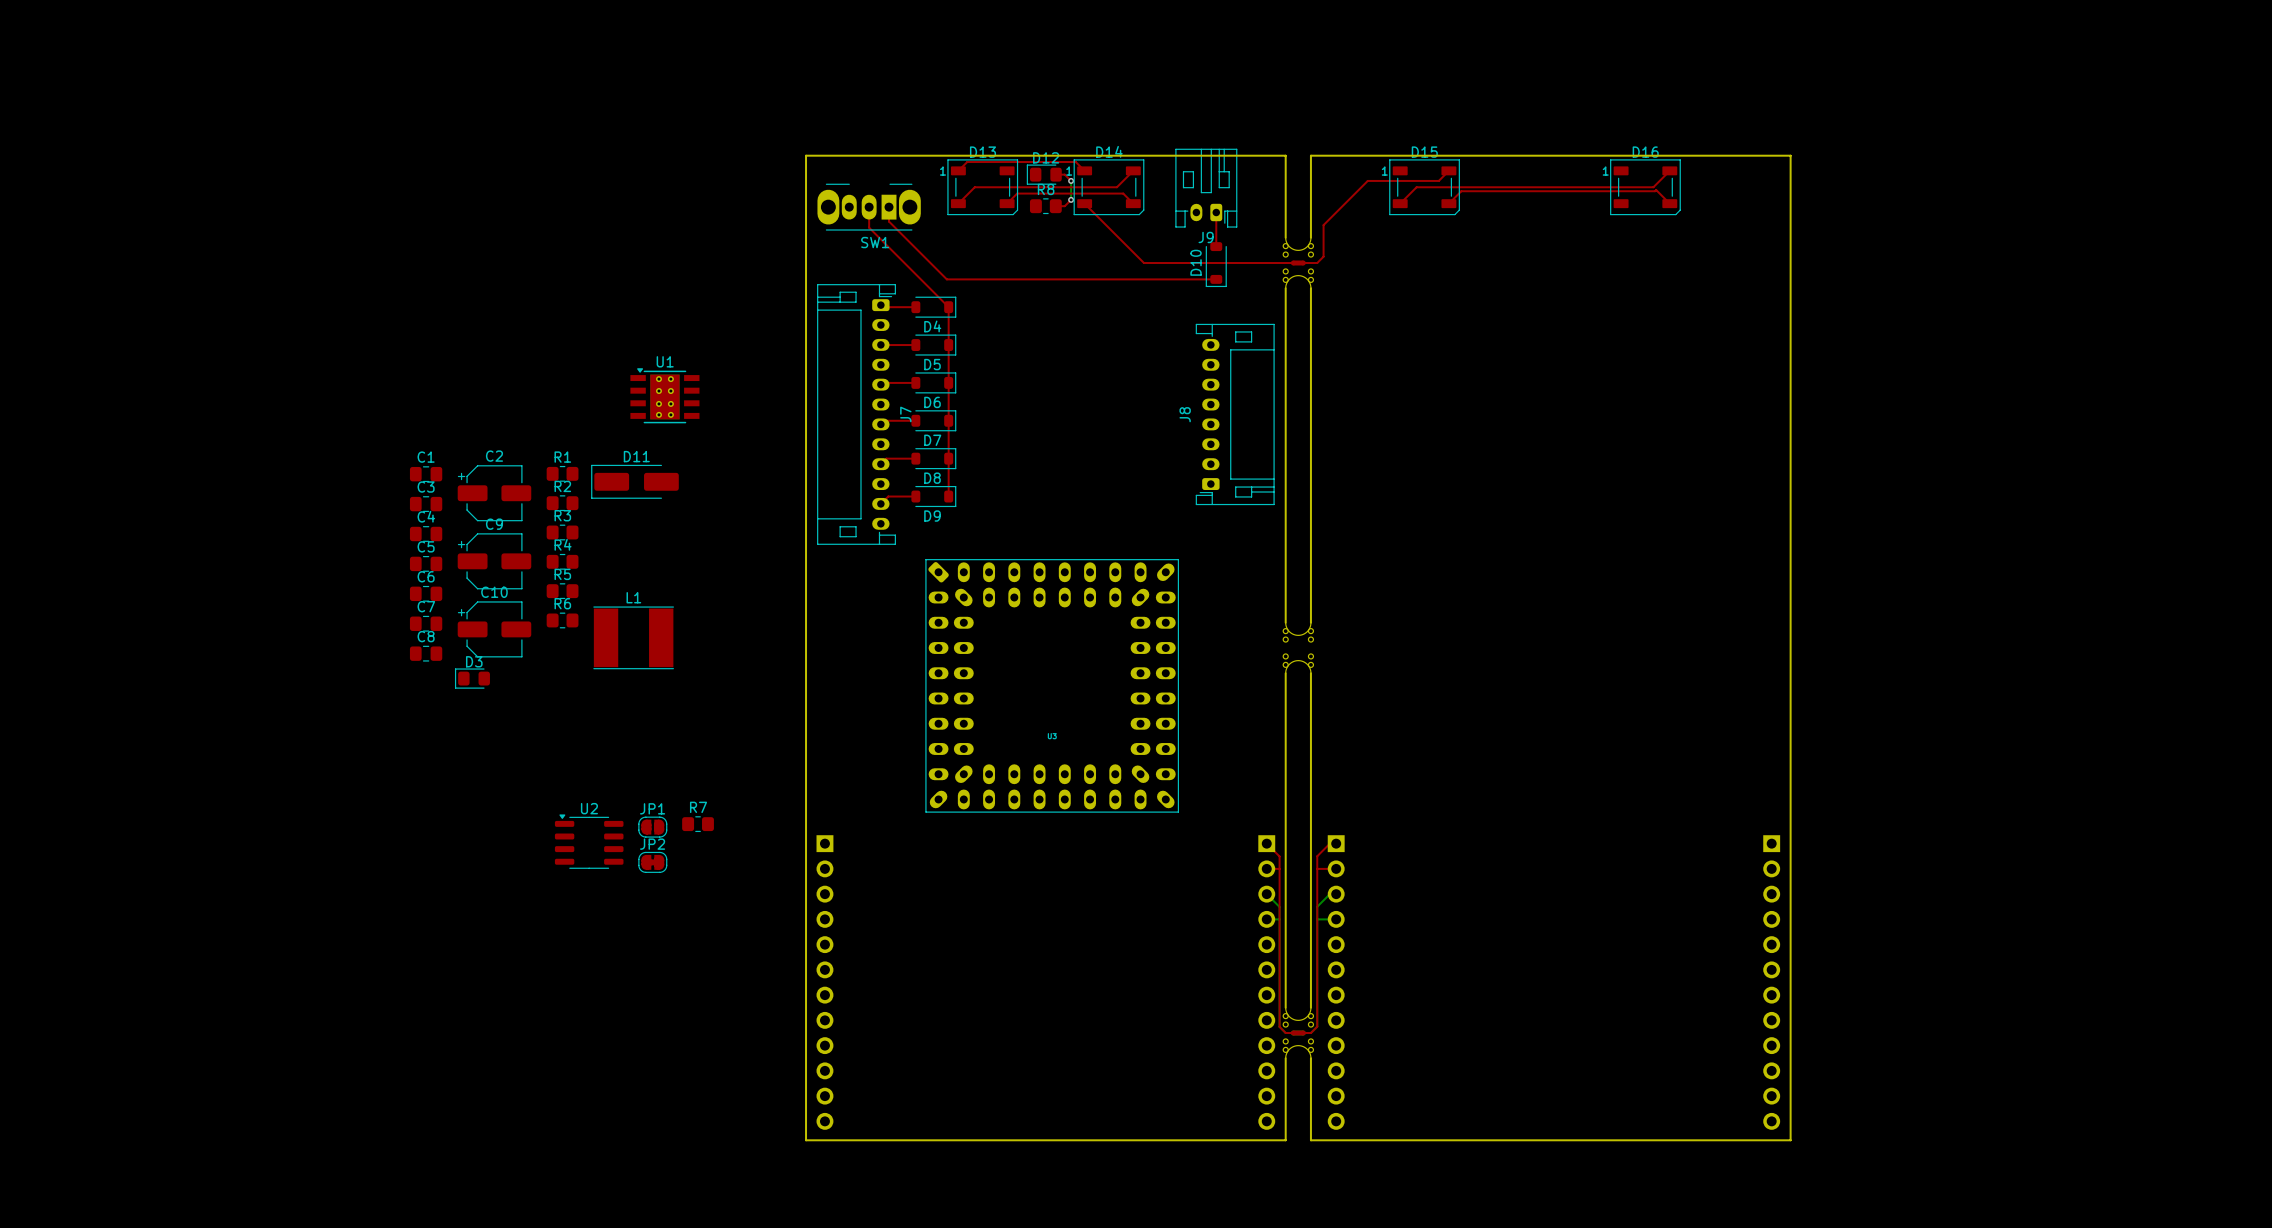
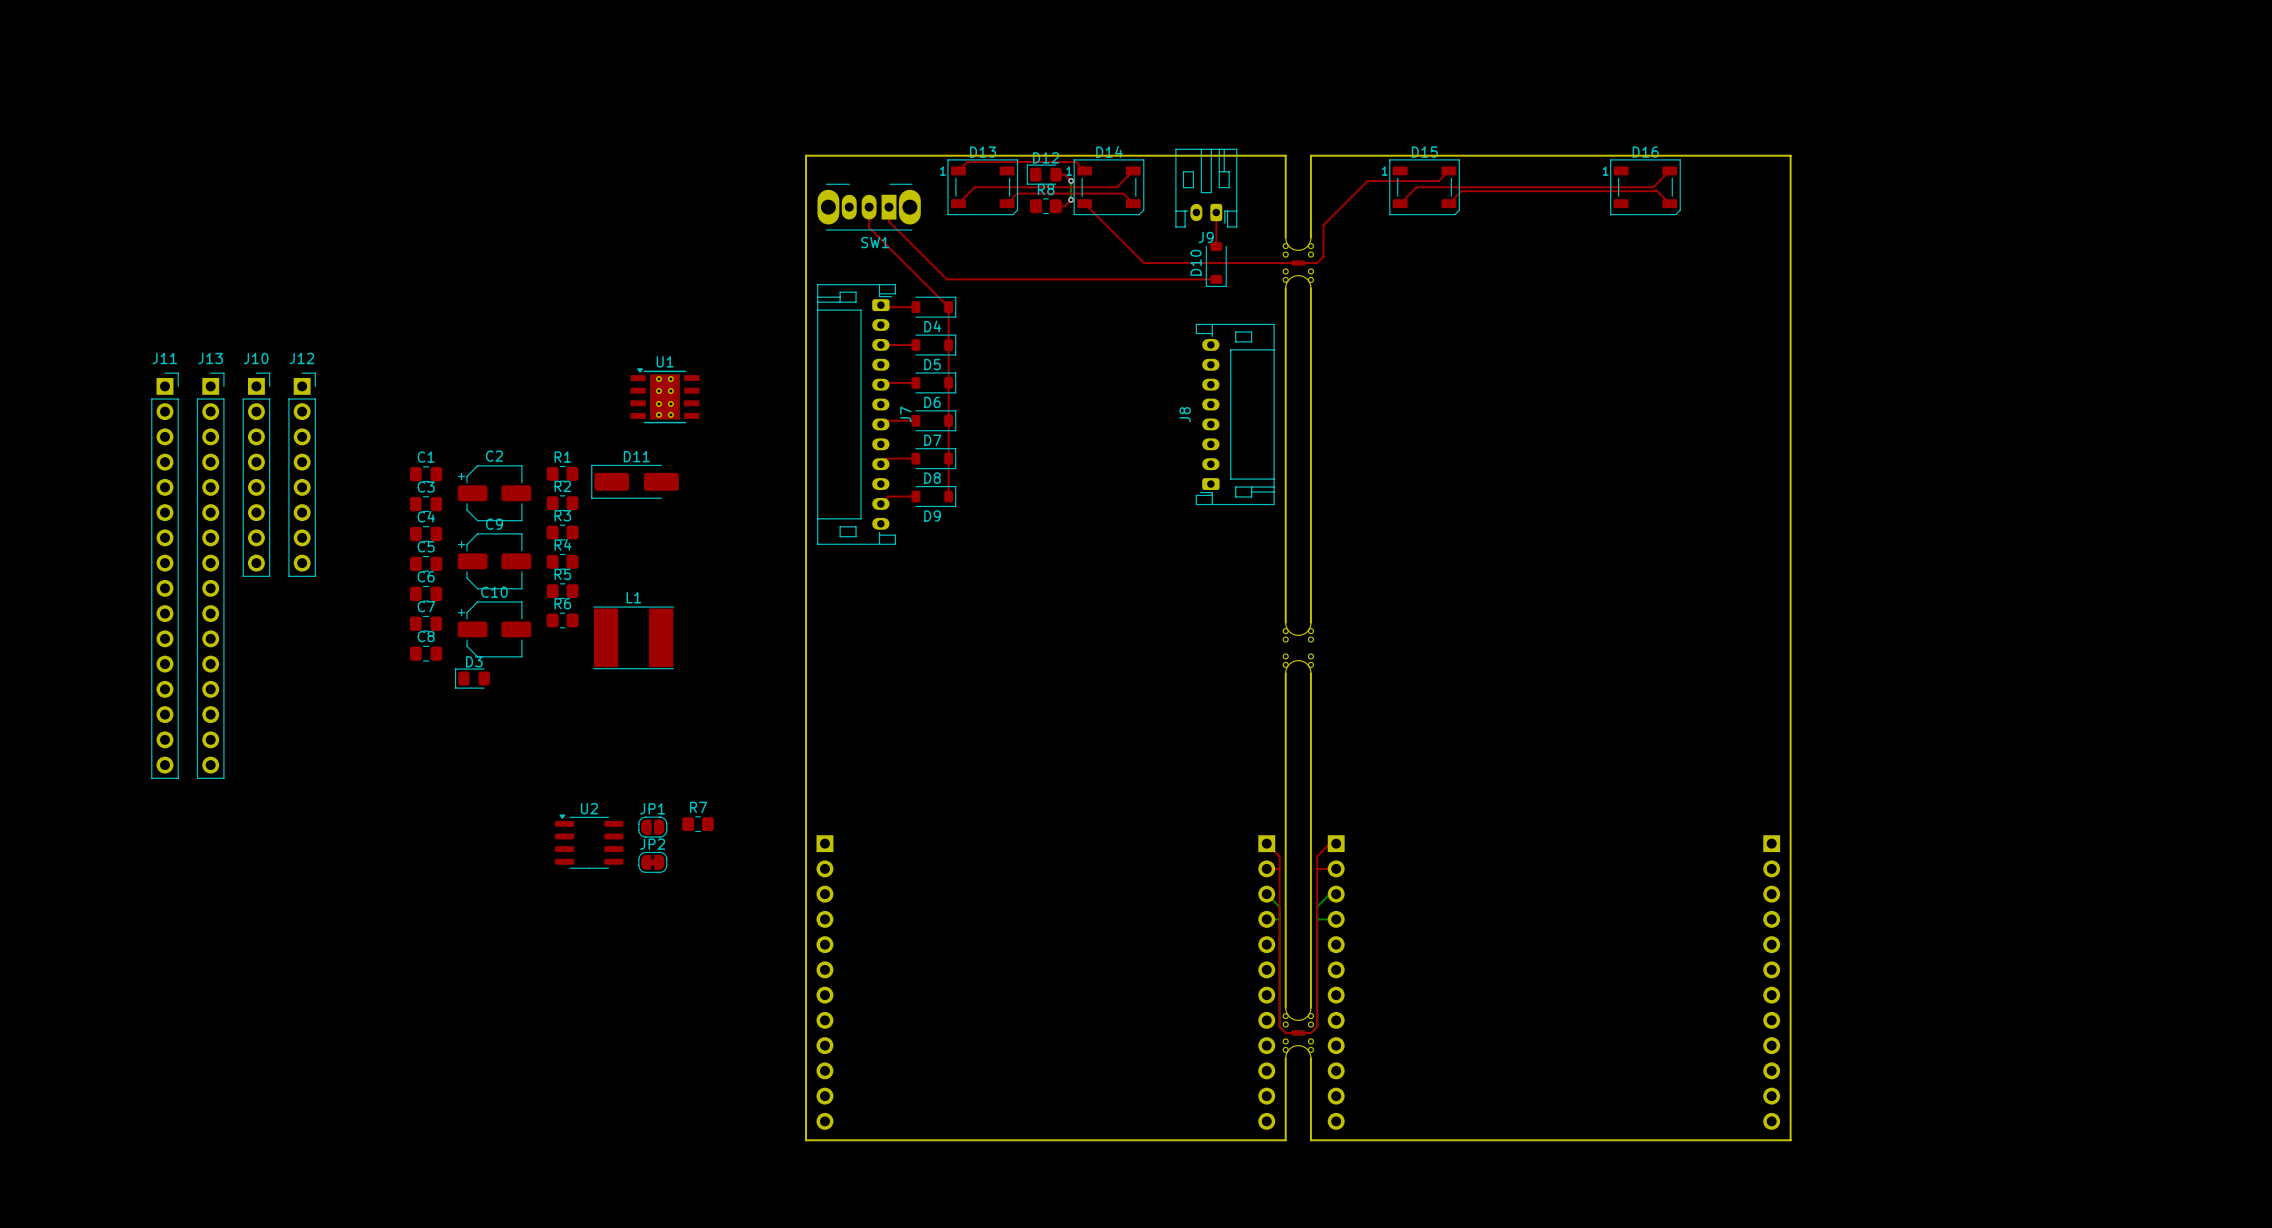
J10: none -> (256, 474)
J12: none -> (302, 474)
J11: none -> (164, 575)
J13: none -> (210, 575)
part: (1052, 685) -> none

